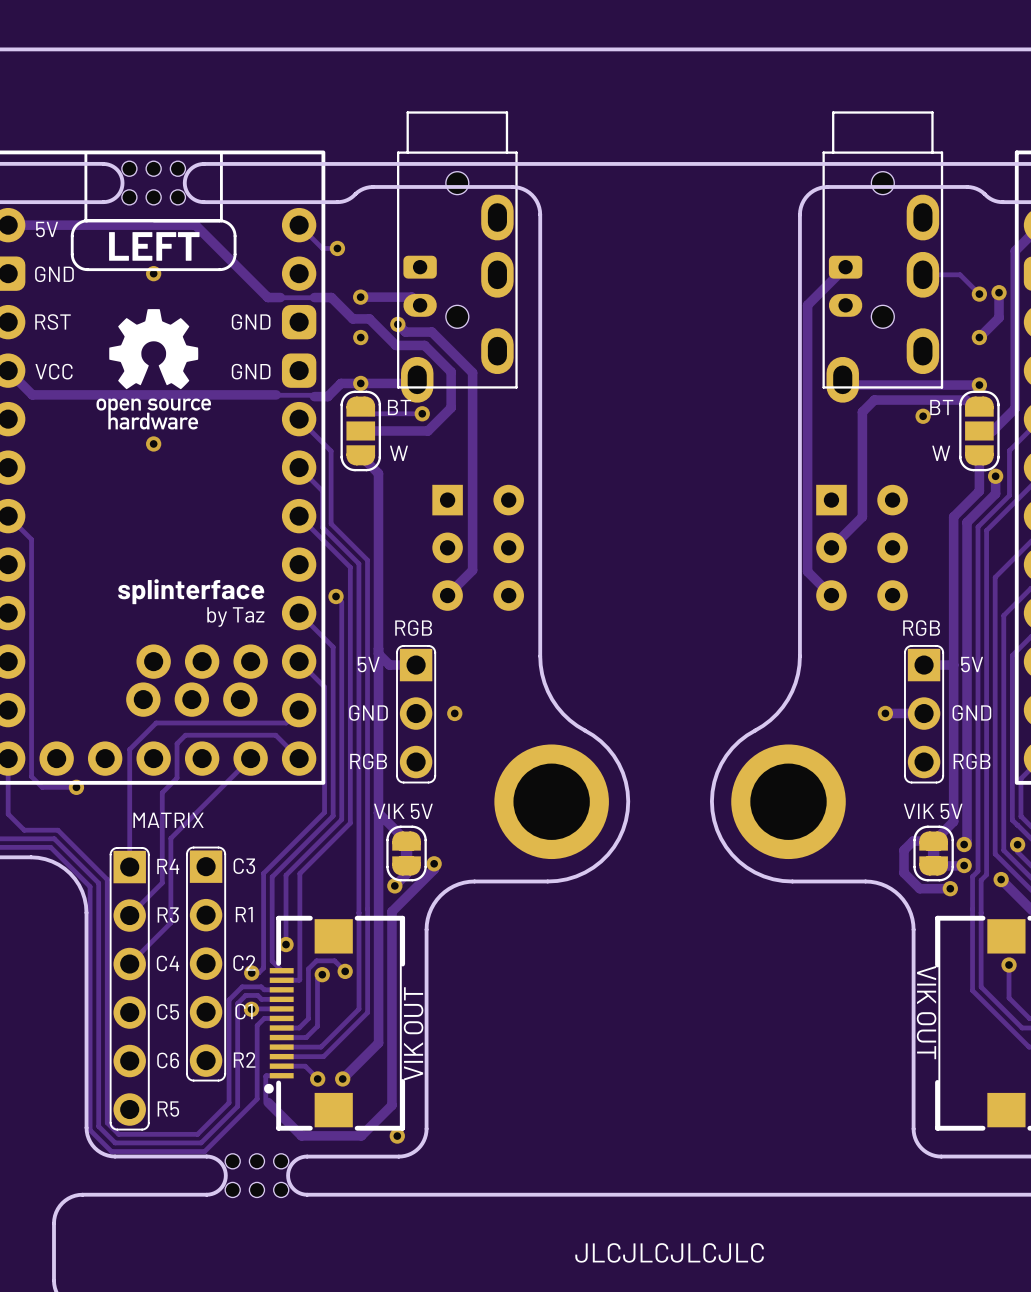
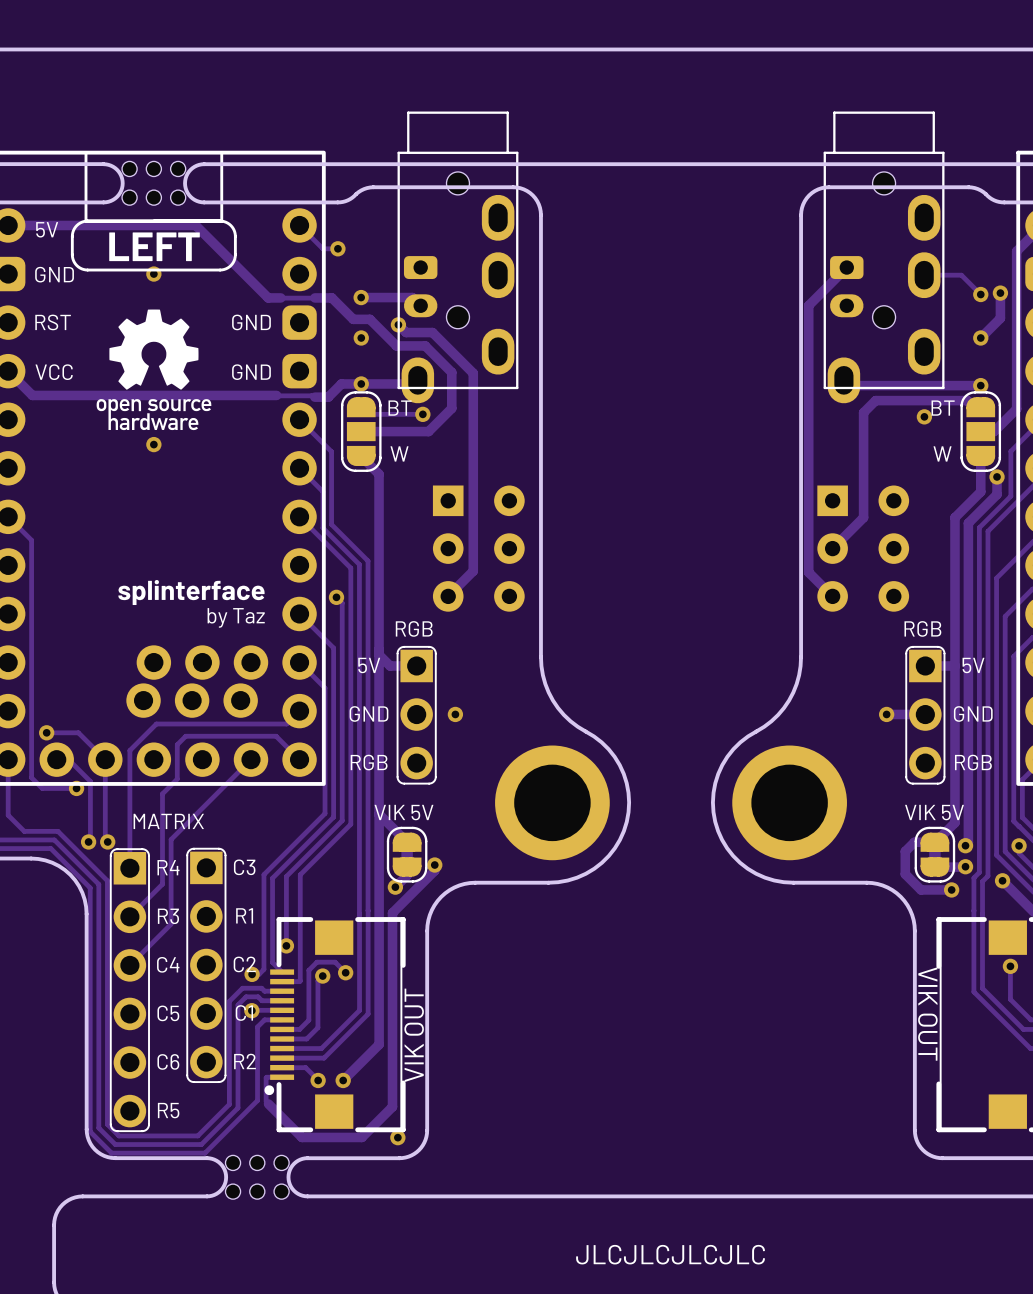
track: none -> (46, 732) (78, 732) (105, 759) (105, 839) (107, 842)
via: none -> (46, 732)
track: none -> (68, 759) (90, 781) (90, 840) (88, 842)
via: none -> (88, 841)
via: none -> (107, 841)

